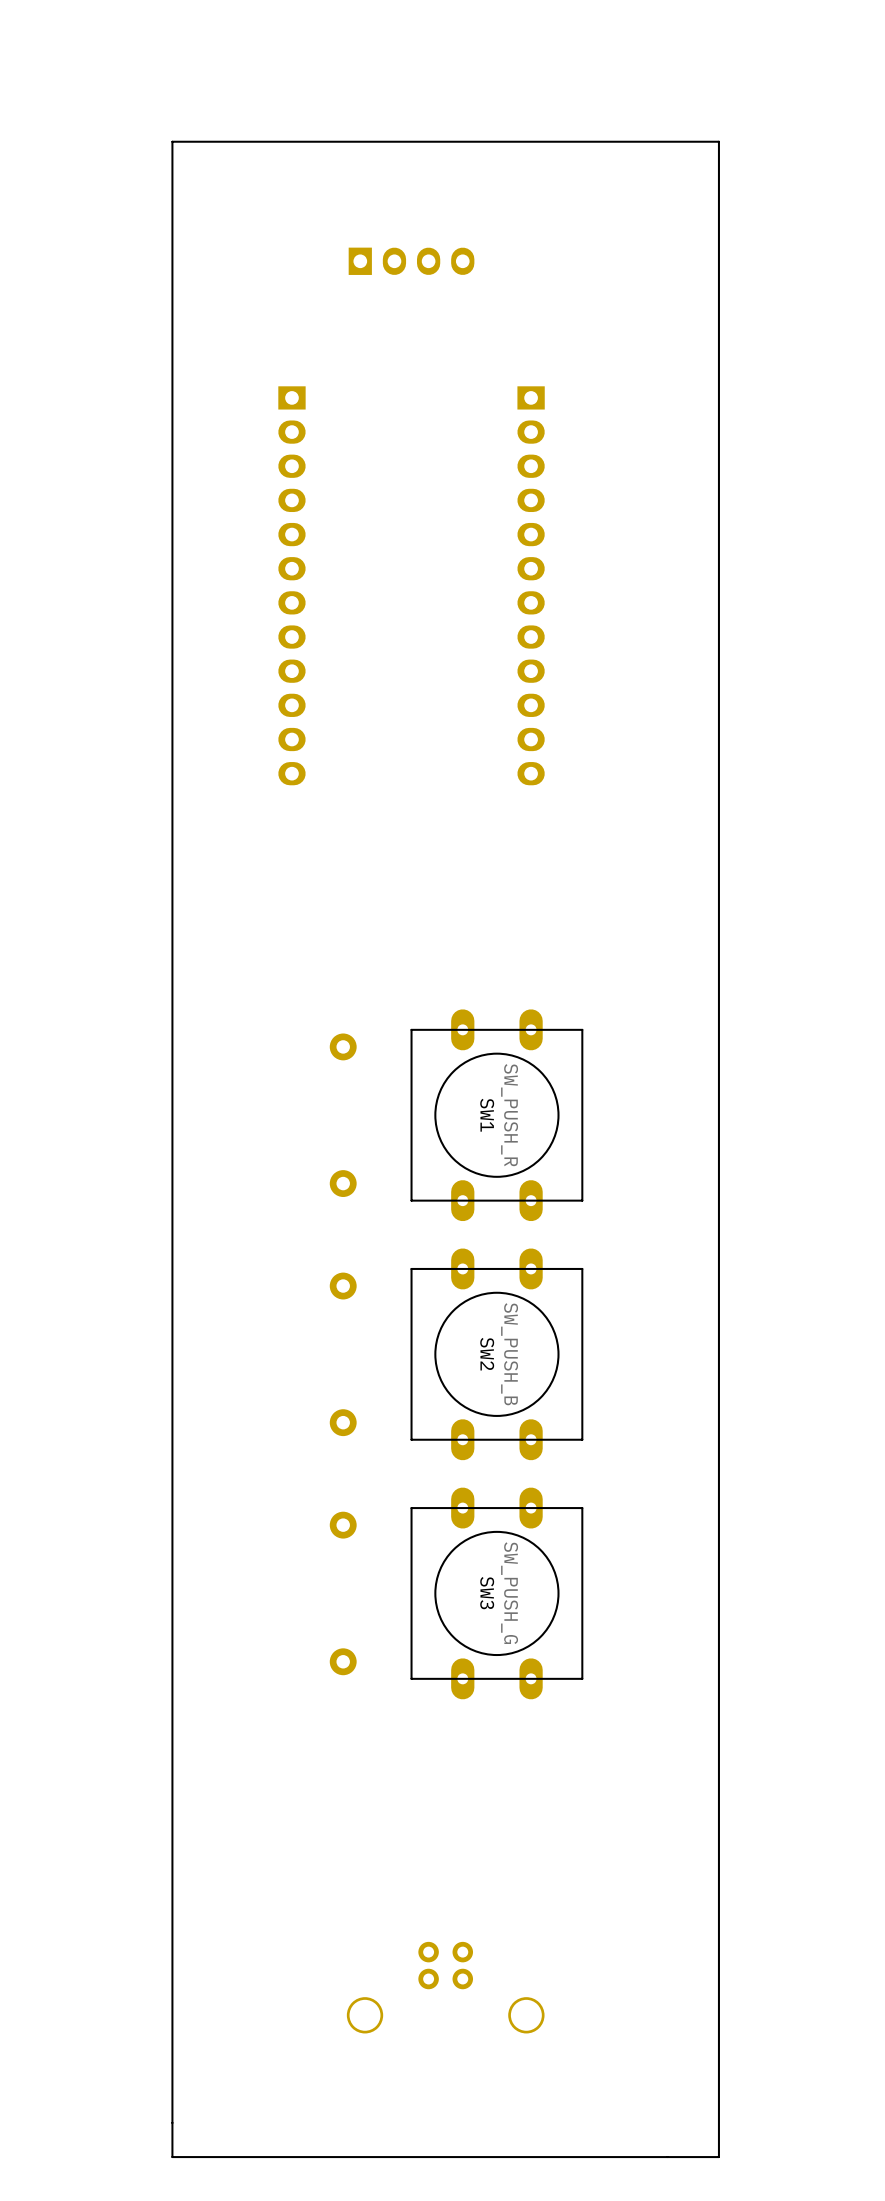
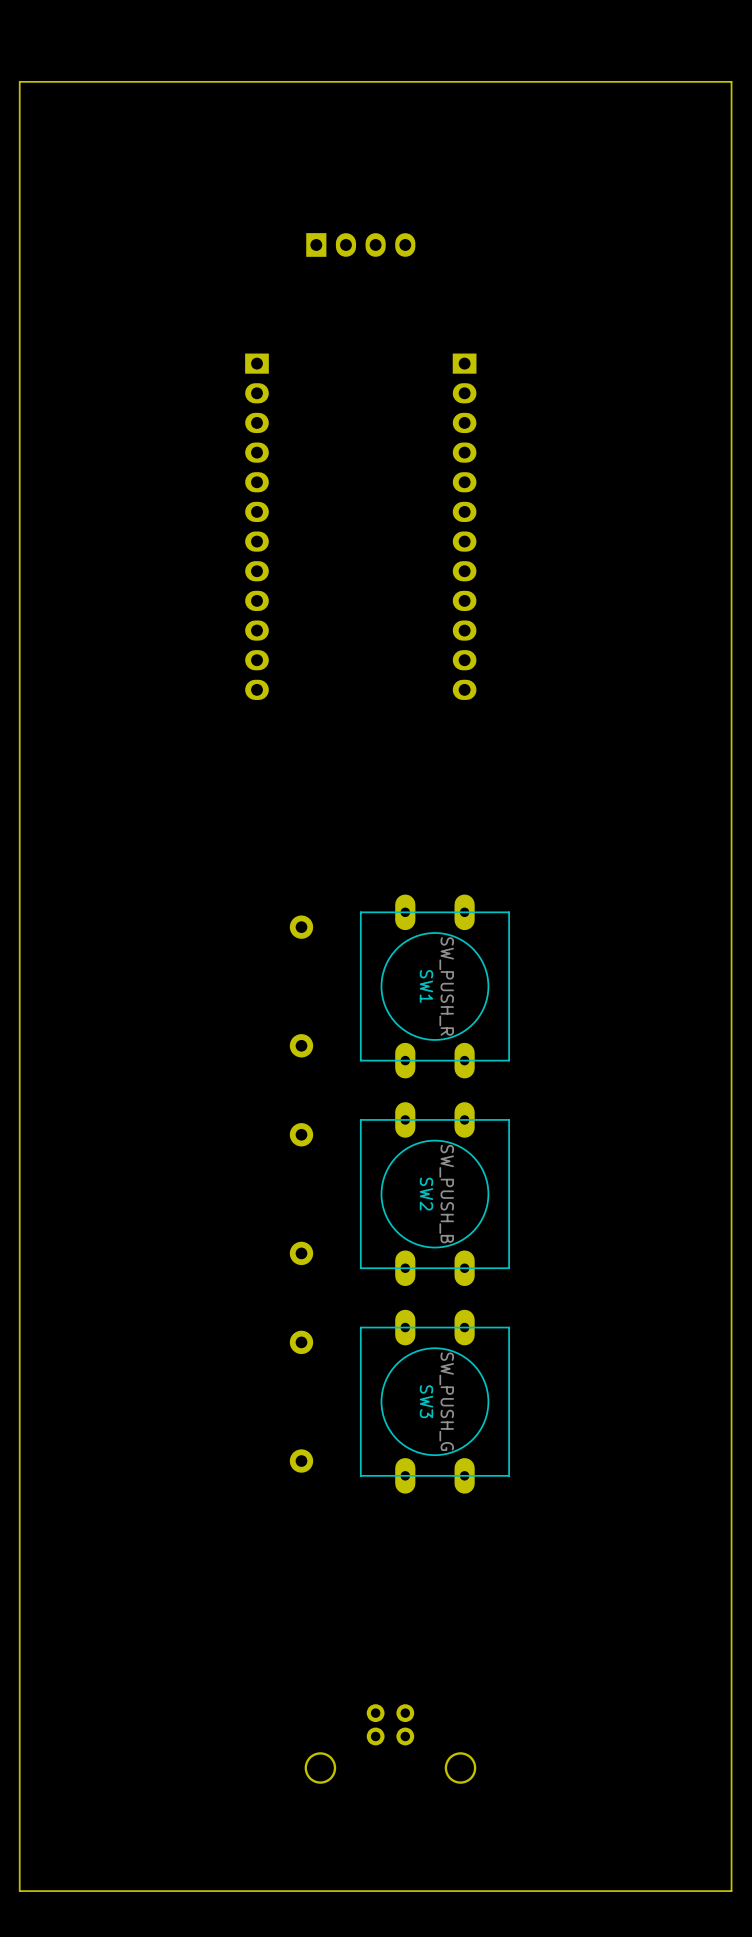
board edge: (718, 2157) (718, 141) (172, 141) (172, 2157) -> (627, 1891) (731, 1891) (731, 81) (19, 81) (19, 1891) (153, 1891)

